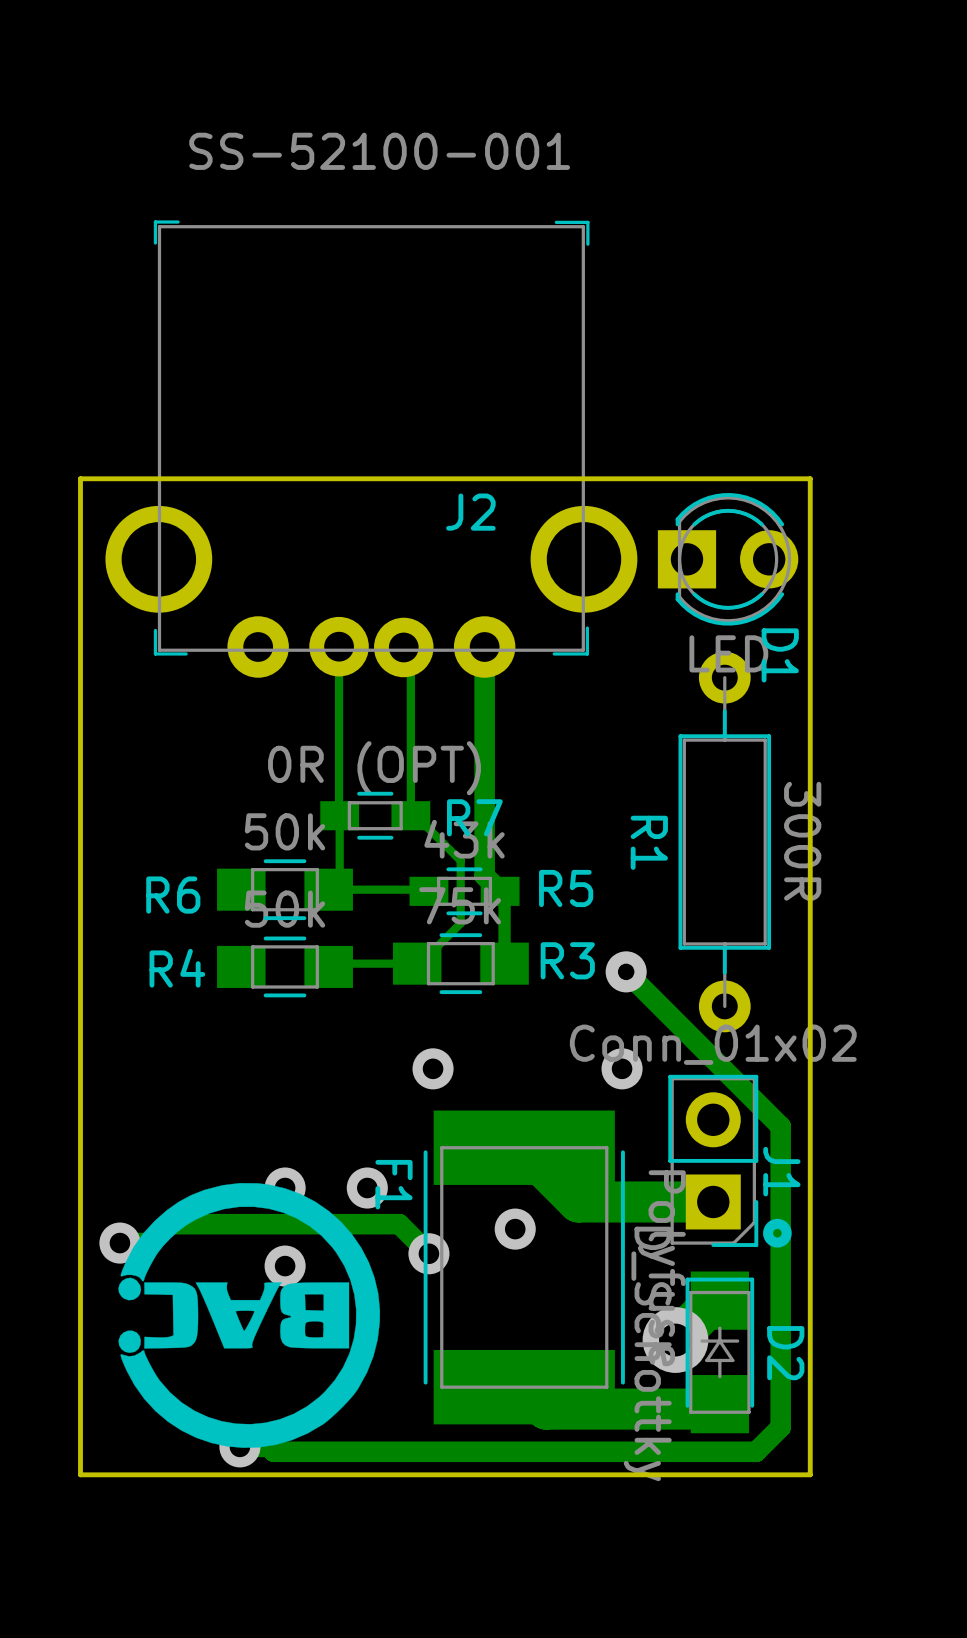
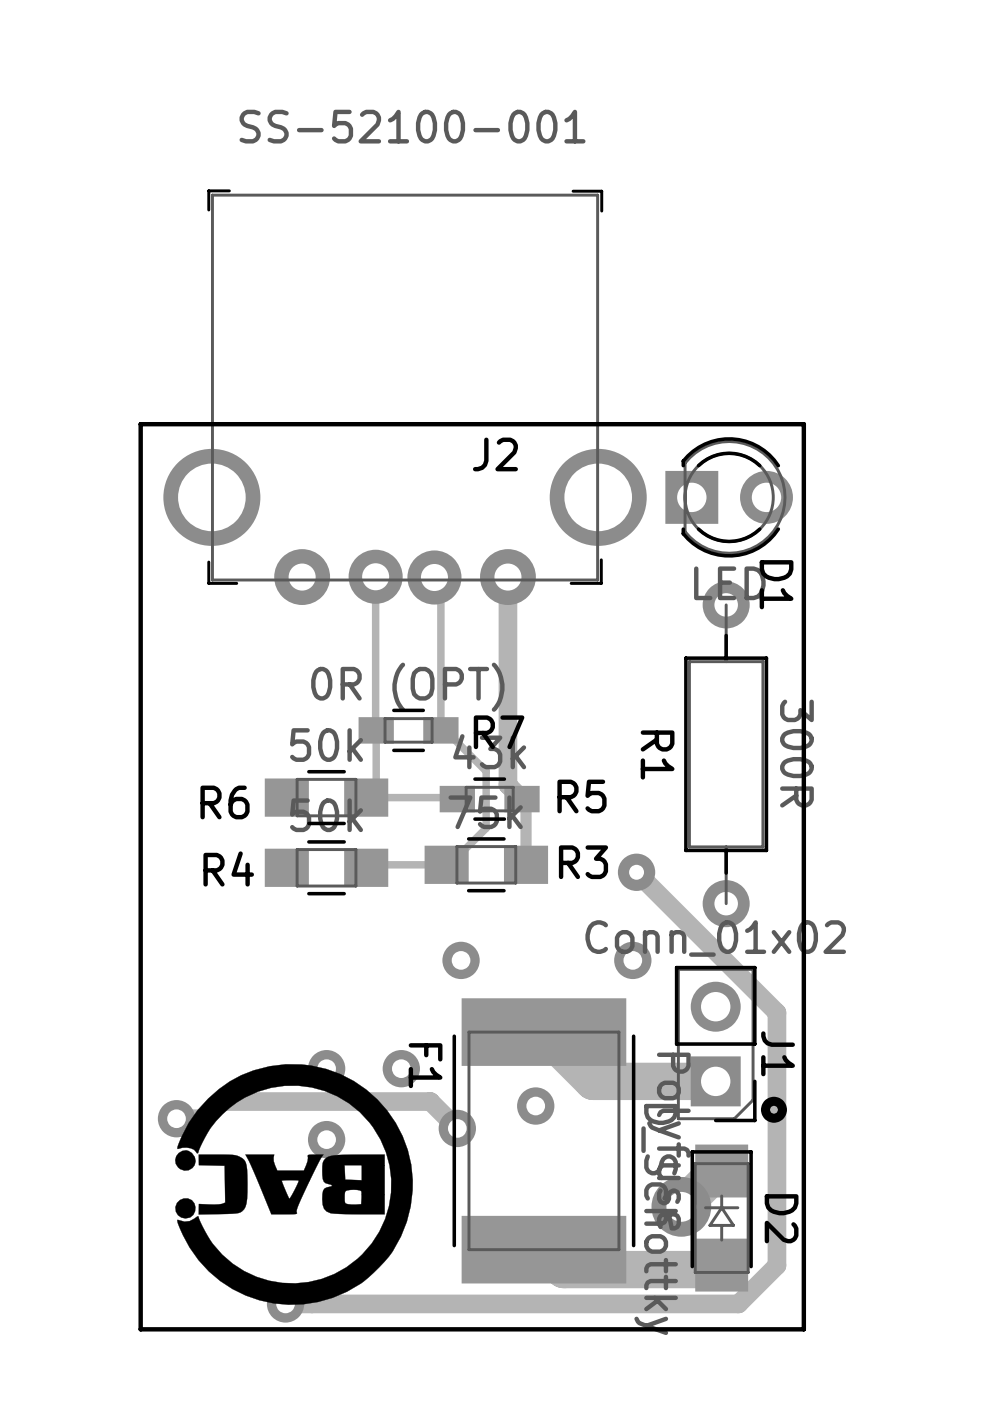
track: (780, 1404) (780, 1427) (756, 1451) (273, 1451) (268, 1446) -> (776, 1265) (738, 1303) (311, 1303)

